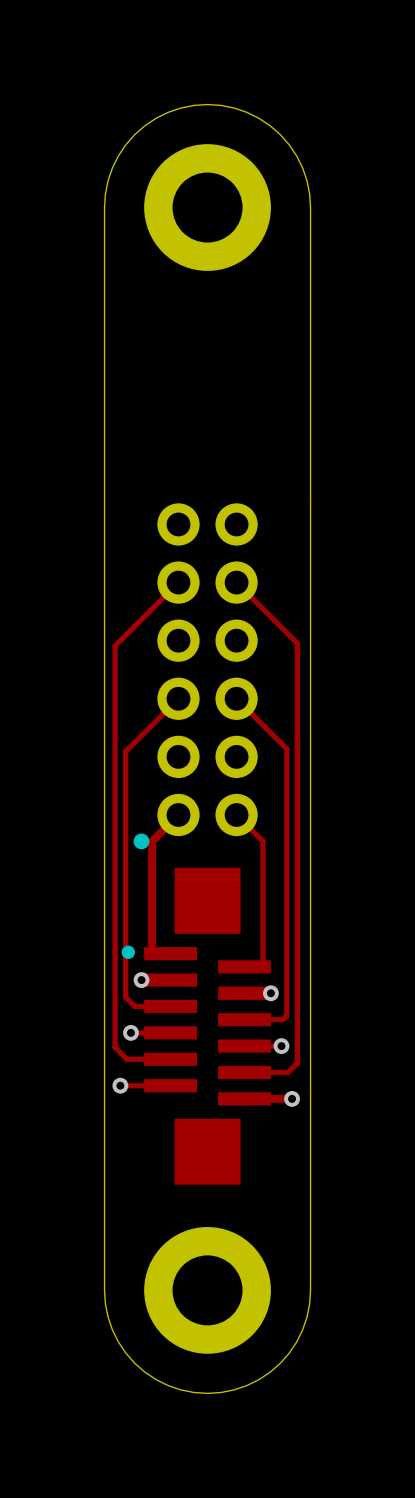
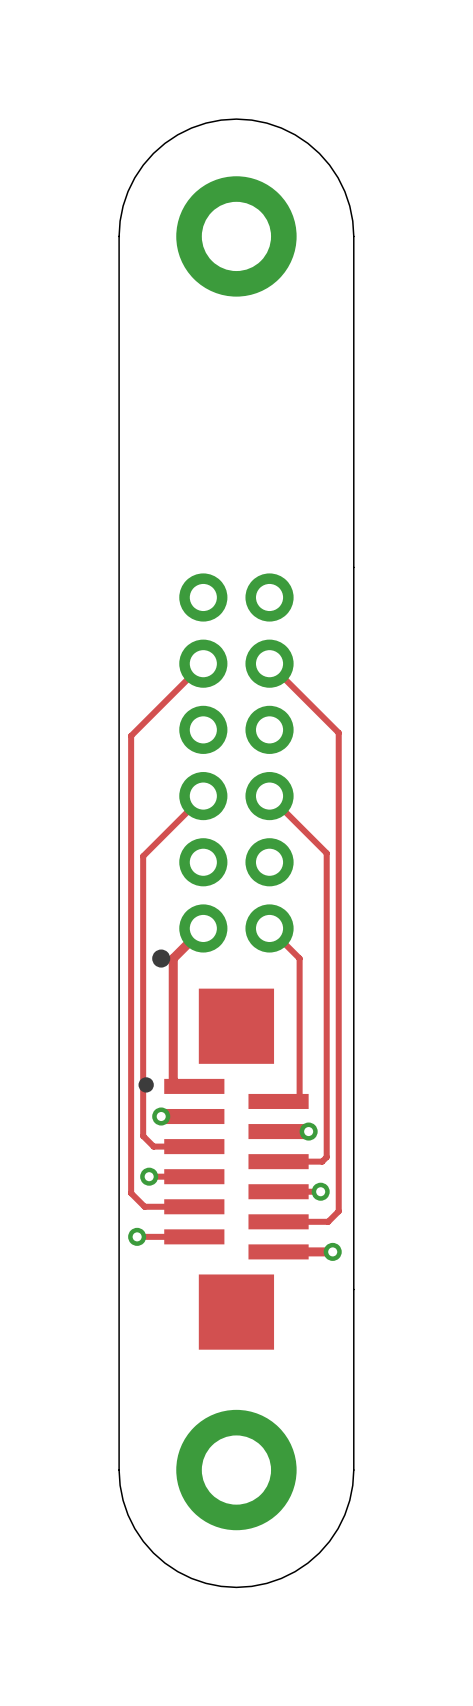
part footprint: [144, 144, 271, 271] -> [176, 176, 297, 297]
part footprint: [144, 1227, 271, 1354] -> [176, 1409, 297, 1531]

